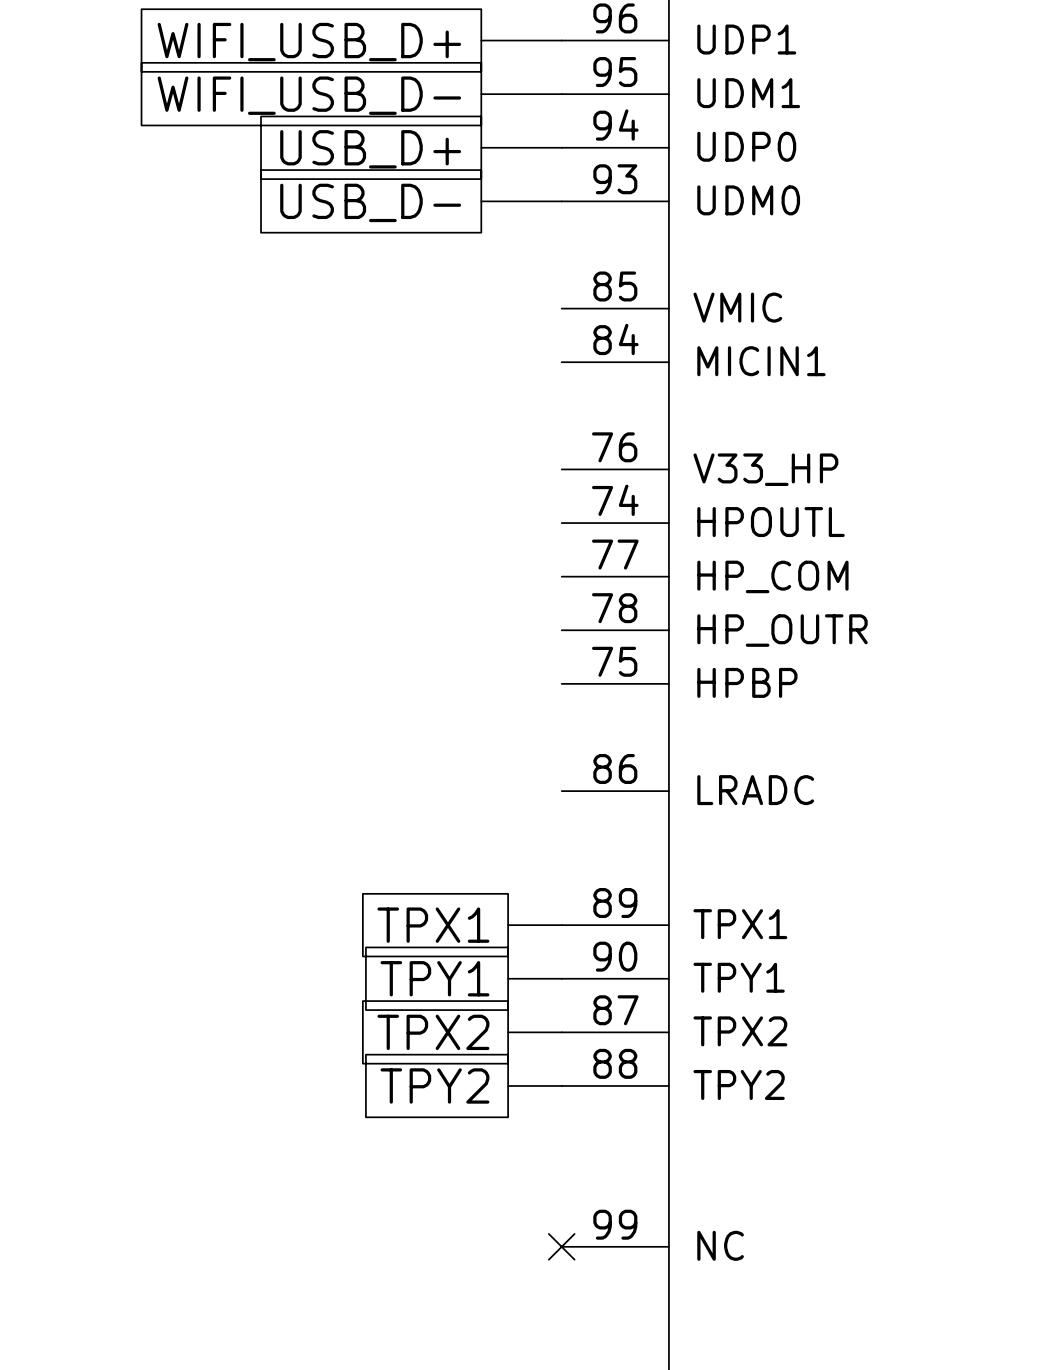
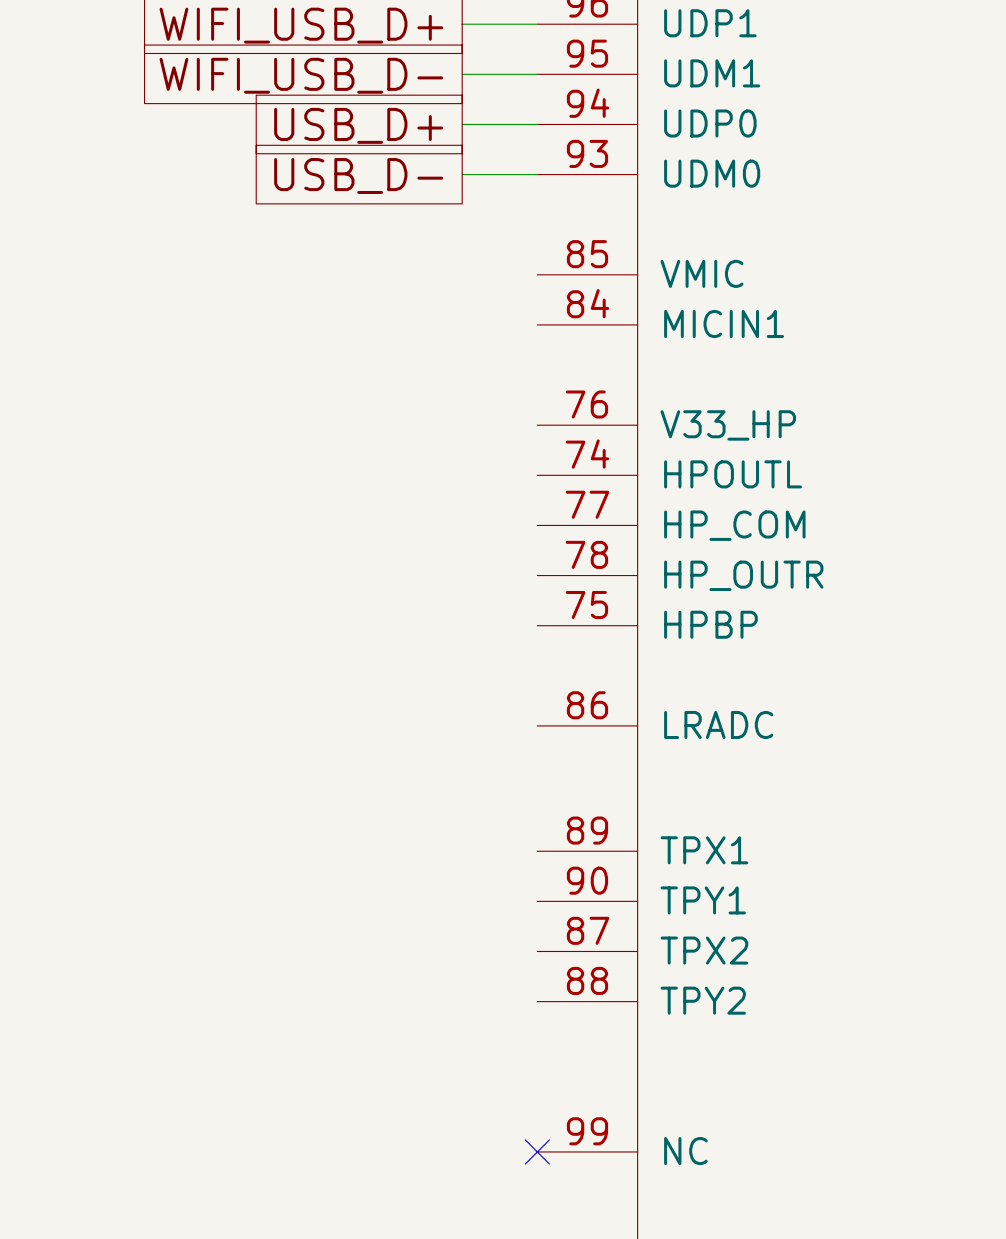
global label: TPX1 (433, 925) -> none
wire: (508, 925) (561, 925) -> none
global label: TPY1 (434, 978) -> none
wire: (508, 978) (561, 978) -> none
global label: TPX2 (433, 1032) -> none
wire: (508, 1032) (561, 1032) -> none
global label: TPY2 (434, 1085) -> none
wire: (508, 1085) (561, 1085) -> none

